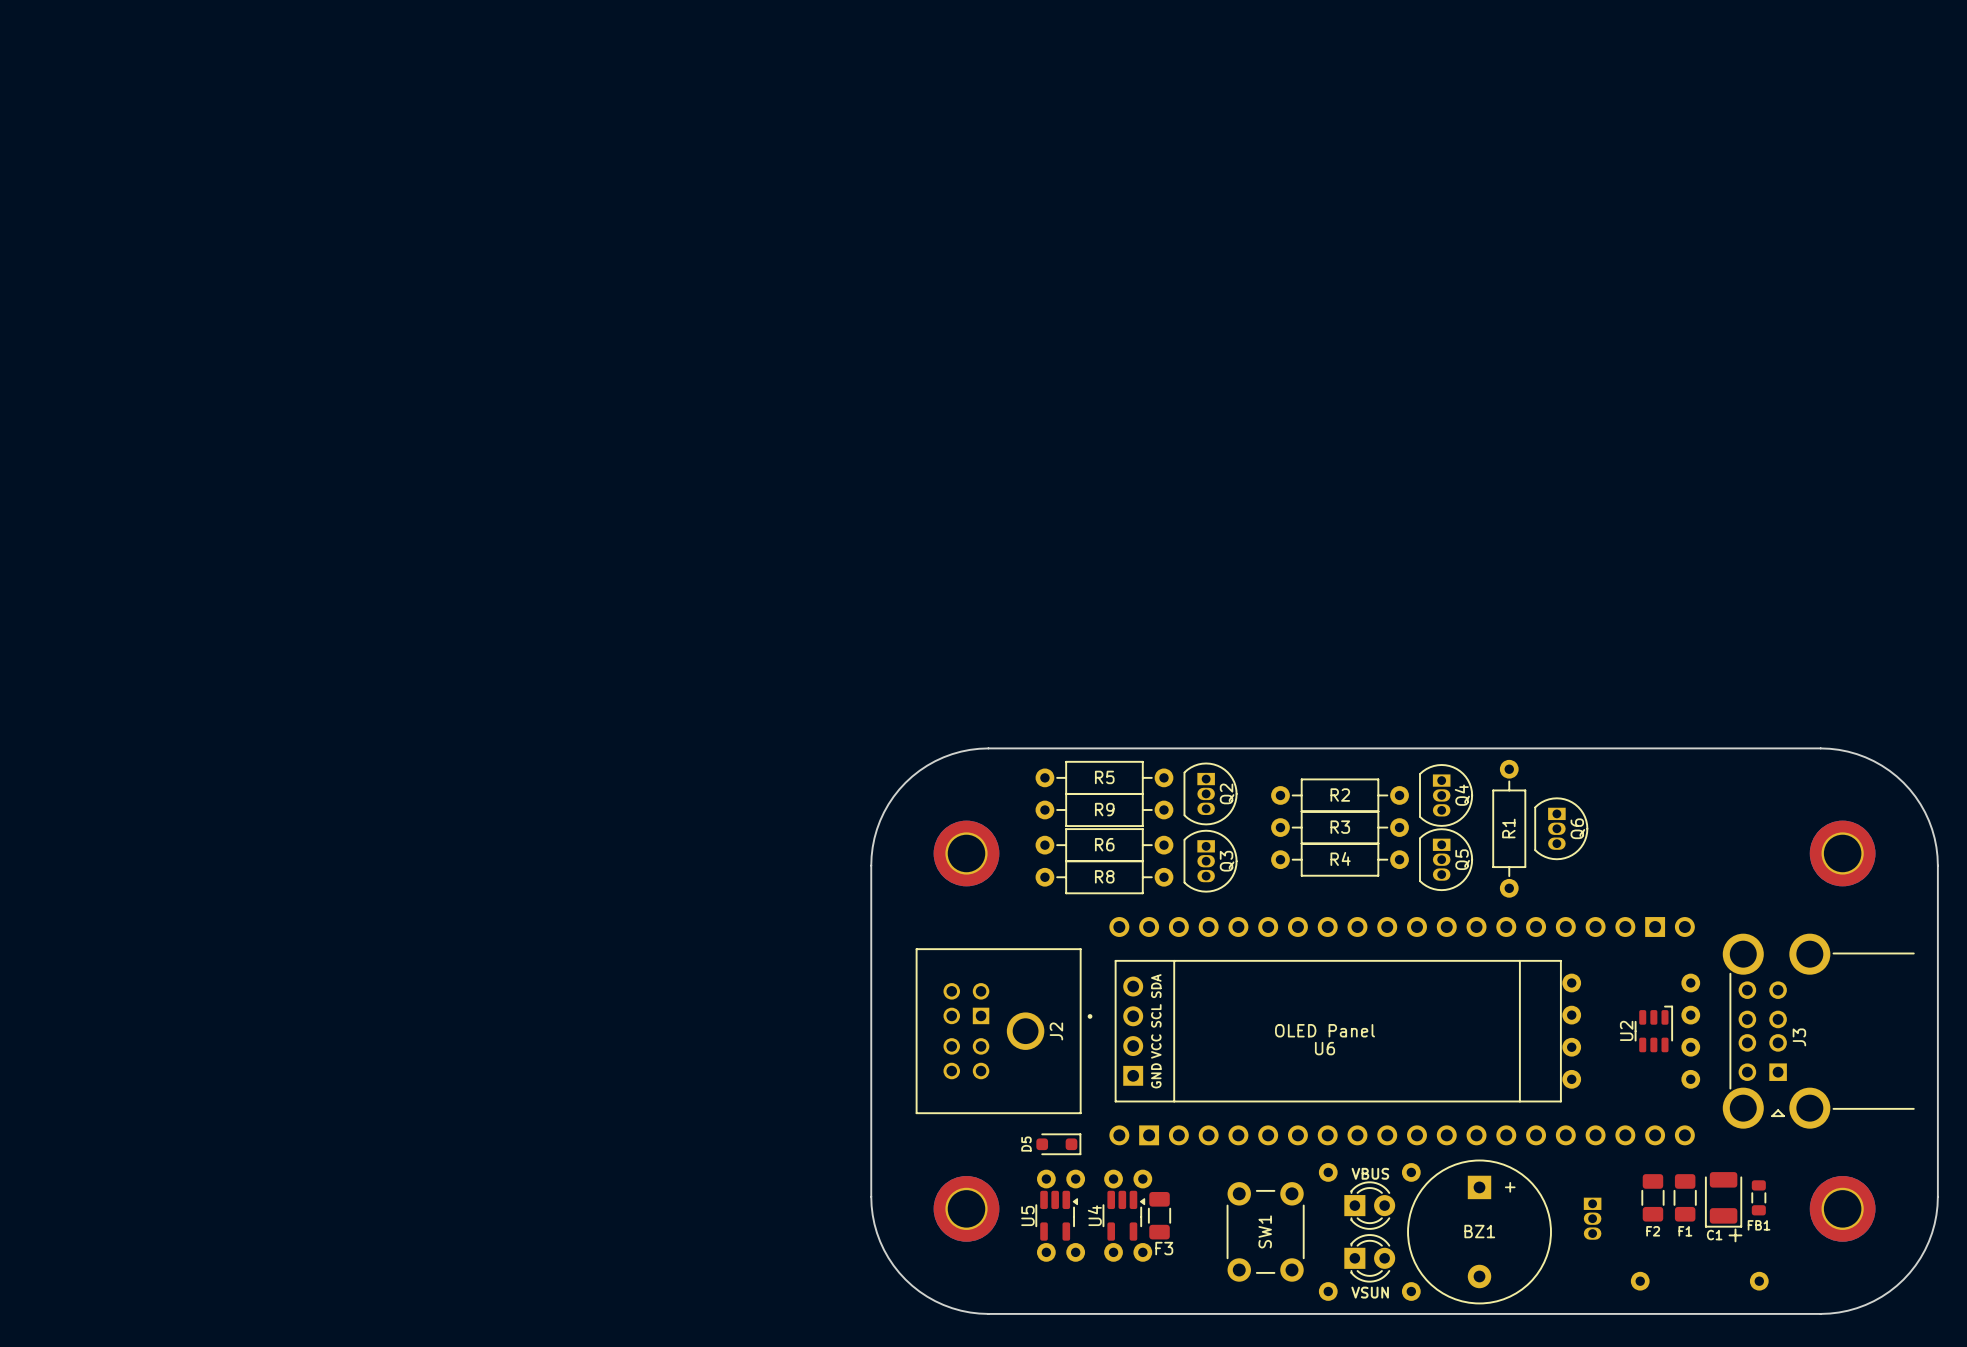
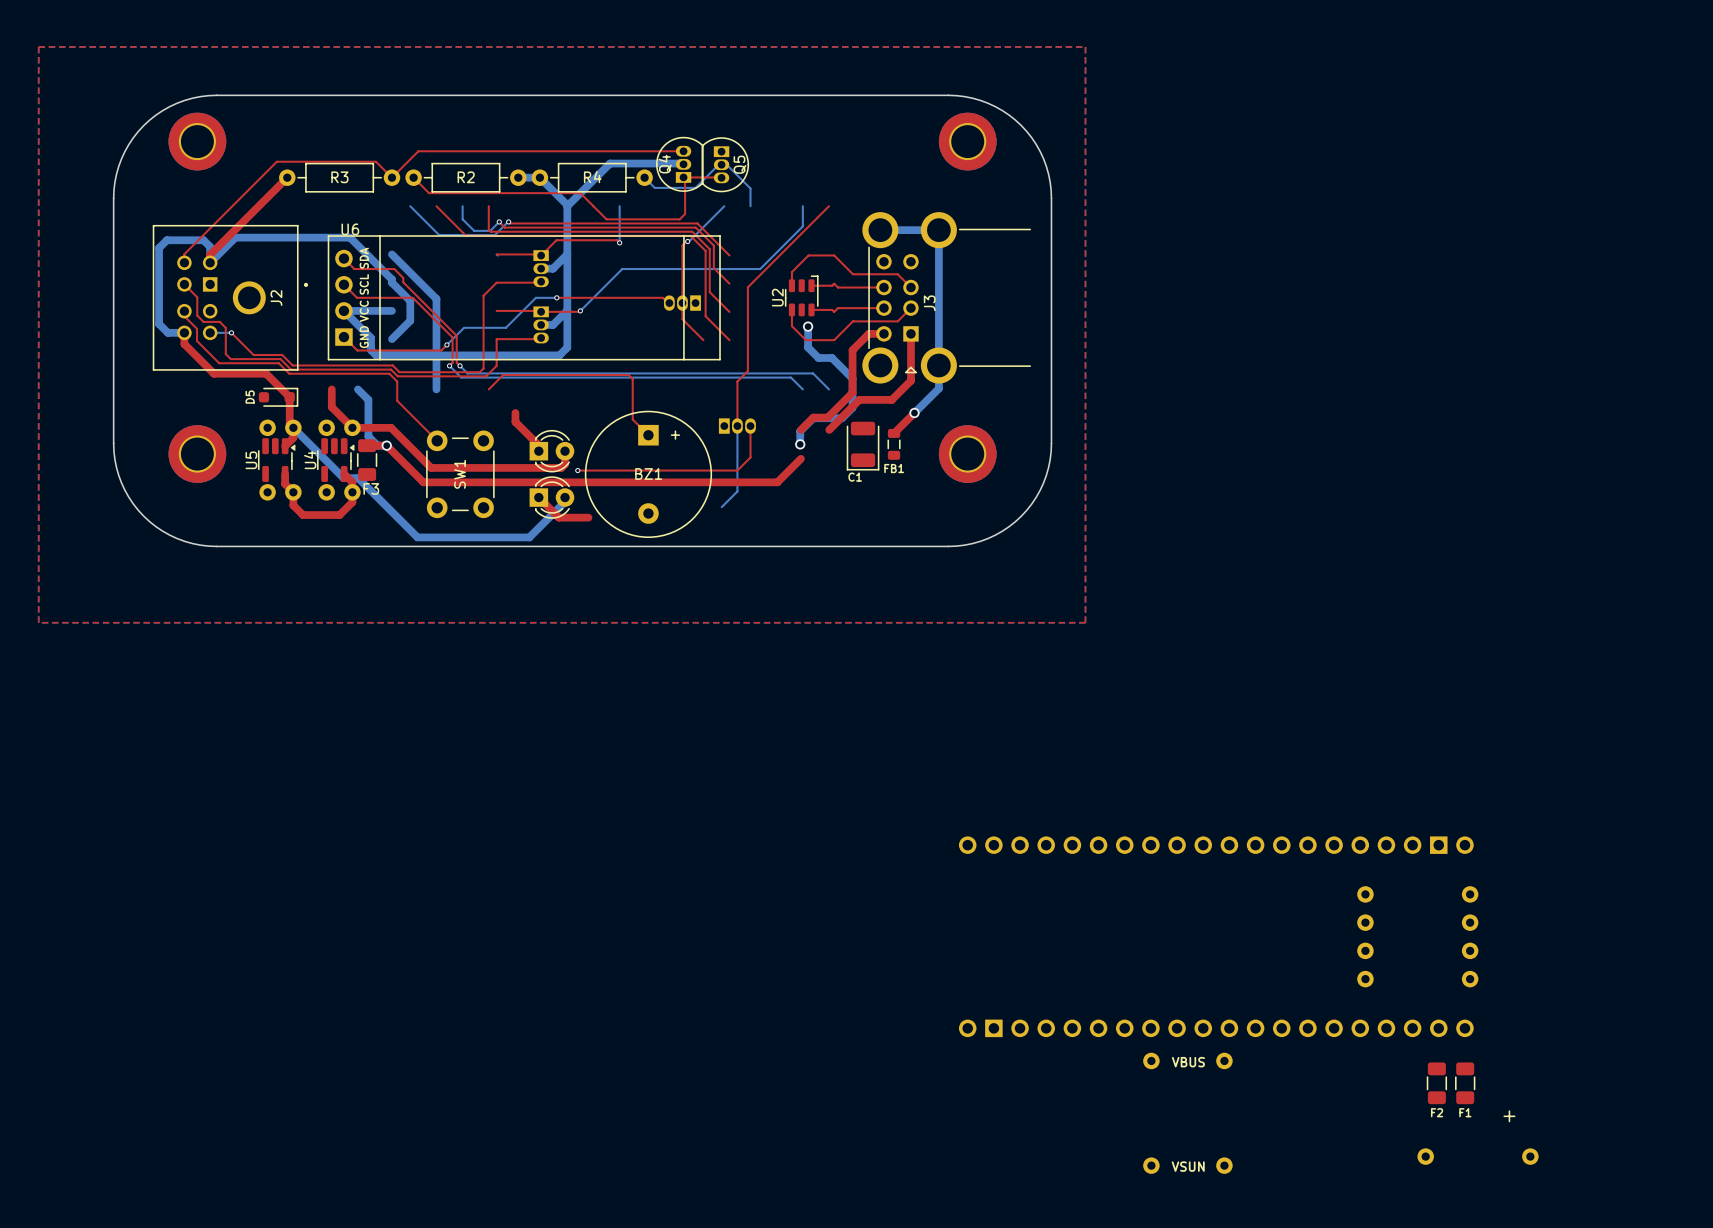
top zone outline: none -> (38, 46) (38, 622) (1085, 622) (1085, 46) (38, 46)
board edge: none -> (216, 95) (948, 95) (972, 98) (995, 106) (1015, 120) (1031, 137) (1046, 166) (1051, 190) (1051, 443) (1048, 467) (1040, 490) (1026, 510) (1008, 526) (987, 538) (956, 546) (216, 546) (192, 543) (169, 535) (149, 521) (133, 503) (121, 482) (114, 459) (113, 190) (118, 166) (124, 151) (138, 131) (149, 120) (177, 103) (200, 96) (216, 95)
part: none -> (197, 141)
part: none -> (967, 141)
top track: none -> (683, 151) (418, 151) (391, 177) (376, 161) (276, 161) (184, 254) (184, 262)
bottom track: none -> (683, 164) (610, 163) (567, 206)
top track: none -> (287, 177) (210, 254) (210, 262)
top track: none -> (413, 177) (429, 193) (580, 193) (606, 219) (679, 219) (685, 214) (683, 177) (721, 177)
bottom track: none -> (518, 177) (539, 177) (567, 205) (567, 347) (559, 355) (376, 355) (371, 350) (371, 337) (343, 310) (391, 310)
bottom track: none -> (644, 177) (654, 187) (695, 187) (718, 164) (726, 164) (750, 188) (750, 206)
bottom track: none -> (410, 206) (439, 235) (494, 235) (508, 221)
top track: none -> (436, 206) (466, 235) (690, 235) (705, 250) (705, 316) (729, 340)
bottom track: none -> (462, 206) (462, 219) (474, 230) (490, 230) (499, 221)
top track: none -> (488, 206) (488, 229) (490, 231) (692, 231) (709, 249) (709, 292) (729, 311)
bottom track: none -> (619, 206) (619, 242)
bottom track: none -> (724, 206) (687, 241)
bottom track: none -> (802, 206) (802, 226) (760, 269) (622, 269) (580, 310)
top track: none -> (829, 206) (747, 287) (747, 371) (737, 381) (737, 426)
top track: none -> (499, 222) (504, 227) (695, 227) (713, 245) (713, 268) (729, 283)
via: none -> (499, 221)
top track: none -> (508, 221) (510, 223) (697, 223) (729, 255)
via: none -> (508, 221)
bottom track: none -> (880, 230) (938, 230) (938, 388) (914, 412)
top track: none -> (687, 241) (682, 245) (682, 319) (703, 340)
via: none -> (687, 241)
top track: none -> (619, 242) (617, 240) (556, 240) (541, 255) (496, 254)
via: none -> (619, 242)
bottom track: none -> (391, 254) (436, 298) (436, 389)
bottom track: none -> (496, 254) (497, 255)
bottom track: none -> (567, 254) (553, 268) (541, 268)
top track: none -> (343, 258) (354, 269) (394, 269) (403, 277) (403, 282) (456, 335) (456, 362) (460, 365)
part: none -> (541, 268)
top track: none -> (541, 281) (496, 282) (483, 295) (483, 368) (479, 372) (399, 372) (392, 365) (292, 365) (282, 355) (253, 355) (231, 332)
top track: none -> (184, 284) (197, 297) (197, 315) (203, 321) (219, 321) (225, 327) (225, 354) (230, 359) (280, 359) (291, 369) (391, 369) (397, 376) (486, 376) (496, 365) (496, 339) (541, 338)
top track: none -> (343, 284) (357, 297) (412, 297) (452, 337) (452, 362) (449, 365)
top track: none -> (791, 285) (791, 272) (808, 255) (834, 255) (852, 274) (897, 274) (910, 287)
top track: none -> (811, 285) (832, 285) (834, 283) (838, 287) (883, 287)
top track: none -> (556, 297) (662, 297) (669, 303)
bottom track: none -> (556, 297) (535, 297) (505, 327) (464, 327) (446, 344)
via: none -> (556, 297)
part: none -> (682, 303)
top track: none -> (883, 308) (838, 308) (834, 311) (832, 309) (811, 309)
top track: none -> (910, 308) (897, 321) (852, 321) (834, 340) (805, 340) (791, 326) (791, 309)
top track: none -> (184, 311) (184, 316) (197, 328) (197, 341) (219, 363) (278, 363) (289, 373) (389, 373) (397, 381) (397, 400) (437, 440)
top track: none -> (496, 310) (580, 310)
bottom track: none -> (567, 310) (553, 324) (541, 324)
via: none -> (580, 310)
part: none -> (541, 324)
bottom track: none -> (808, 326) (808, 347) (818, 358) (832, 358) (852, 378) (852, 407) (842, 418) (813, 418) (800, 431) (800, 444)
via: none -> (808, 326)
top track: none -> (184, 332) (184, 344) (214, 373) (266, 373) (289, 397) (289, 424) (293, 427) (293, 437) (285, 446)
bottom track: none -> (184, 332) (167, 332) (159, 323) (159, 248) (166, 240) (203, 240) (210, 246) (210, 262) (235, 237) (350, 237) (391, 279) (391, 282) (410, 301) (410, 320) (391, 339)
bottom track: none -> (210, 332) (231, 332)
via: none -> (231, 332)
top track: none -> (883, 333) (868, 333) (852, 350) (852, 392) (827, 417) (813, 417) (800, 429)
top track: none -> (910, 333) (910, 380) (891, 399) (859, 399) (829, 429)
top track: none -> (343, 337) (357, 350) (441, 350) (446, 344)
via: none -> (446, 344)
bottom track: none -> (449, 365) (461, 377) (791, 377) (802, 389)
via: none -> (449, 365)
bottom track: none -> (460, 365) (467, 373) (813, 373) (829, 389)
via: none -> (460, 365)
top track: none -> (331, 389) (331, 407) (352, 427) (391, 427) (431, 467) (561, 467) (565, 464) (565, 451)
bottom track: none -> (357, 389) (368, 399) (368, 436) (377, 445) (386, 445)
top track: none -> (488, 389) (503, 375) (628, 375) (632, 378) (632, 419) (648, 435)
top track: none -> (515, 412) (515, 422) (538, 445) (538, 451)
top track: none -> (914, 412) (894, 433)
via: none -> (914, 412)
bottom track: none -> (737, 426) (737, 491) (721, 507)
part: none -> (737, 426)
top track: none -> (750, 426) (750, 457) (737, 470) (577, 470)
part: none -> (280, 427)
bottom track: none -> (293, 427) (343, 478) (358, 478) (417, 537) (529, 537) (565, 501) (565, 497)
part: none -> (339, 427)
via: none -> (800, 444)
top track: none -> (367, 445) (386, 445) (423, 482) (777, 482) (800, 458)
via: none -> (386, 445)
part: none -> (551, 451)
part: none -> (197, 454)
part: none -> (967, 454)
via: none -> (577, 470)
top track: none -> (285, 473) (285, 484) (293, 492) (293, 505) (303, 515) (339, 515) (352, 502) (352, 482) (344, 473)
part: none -> (280, 492)
part: none -> (339, 492)
top track: none -> (538, 497) (558, 517) (588, 517)
part: none -> (551, 497)
board edge: (988, 748) (1820, 748) (1848, 751) (1873, 761) (1903, 782) (1920, 804) (1932, 829) (1937, 856) (1937, 1196) (1934, 1224) (1925, 1249) (1909, 1272) (1881, 1296) (1856, 1308) (1829, 1313) (988, 1313) (961, 1310) (935, 1301) (912, 1285) (893, 1265) (880, 1241) (872, 1215) (871, 856) (876, 829) (884, 812) (893, 796) (912, 776) (935, 761) (952, 754) (988, 748) -> none
R5: (1104, 777) -> none
Q2: (1210, 793) -> none
R2 position: (1340, 795) -> (465, 177)
Q4 rotation: 0° (1446, 795) -> 180° (679, 164)
Q4 position: (1446, 795) -> (679, 164)
R9: (1104, 809) -> none
R3 position: (1340, 827) -> (339, 177)
R1: (1509, 828) -> none
Q6: (1561, 828) -> none
R6: (1104, 845) -> none
part: (966, 853) -> none
part: (1842, 853) -> none
R4 position: (1340, 859) -> (592, 177)
Q5 position: (1446, 859) -> (725, 164)
Q3: (1210, 861) -> none
R8: (1104, 877) -> none
U2 position: (1653, 1029) -> (801, 295)
U6 text: OLED Panel (1325, 1030) -> none
J2 position: (1004, 1031) -> (230, 297)
U6 position: (1338, 1031) -> (524, 297)
J3 position: (1818, 1031) -> (946, 297)
U6 name position: U6 (1325, 1048) -> U6 (350, 229)
D5 position: (1058, 1144) -> (278, 397)
part: (1061, 1179) -> none
part: (1128, 1179) -> none
FB1 position: (1758, 1197) -> (894, 444)
C1 position: (1723, 1199) -> (863, 446)
part: (1369, 1205) -> none
part: (966, 1208) -> none
part: (1842, 1208) -> none
U5 position: (1056, 1215) -> (276, 460)
U4 position: (1123, 1215) -> (335, 460)
F3 position: (1159, 1215) -> (367, 460)
part: (1592, 1218) -> none
SW1 position: (1265, 1231) -> (460, 474)
BZ1 position: (1479, 1231) -> (648, 474)
part: (1061, 1252) -> none
part: (1128, 1252) -> none
part: (1369, 1258) -> none

